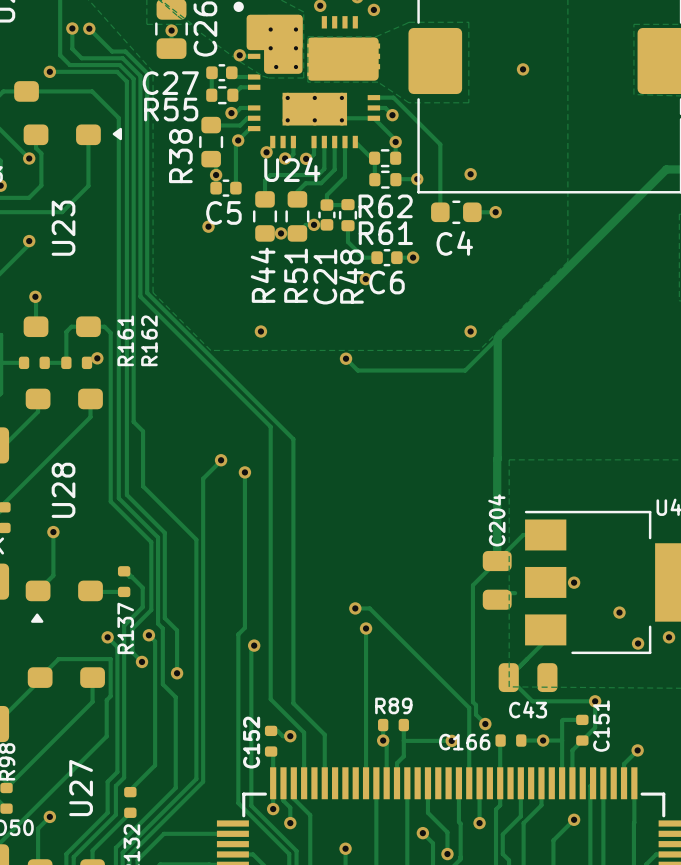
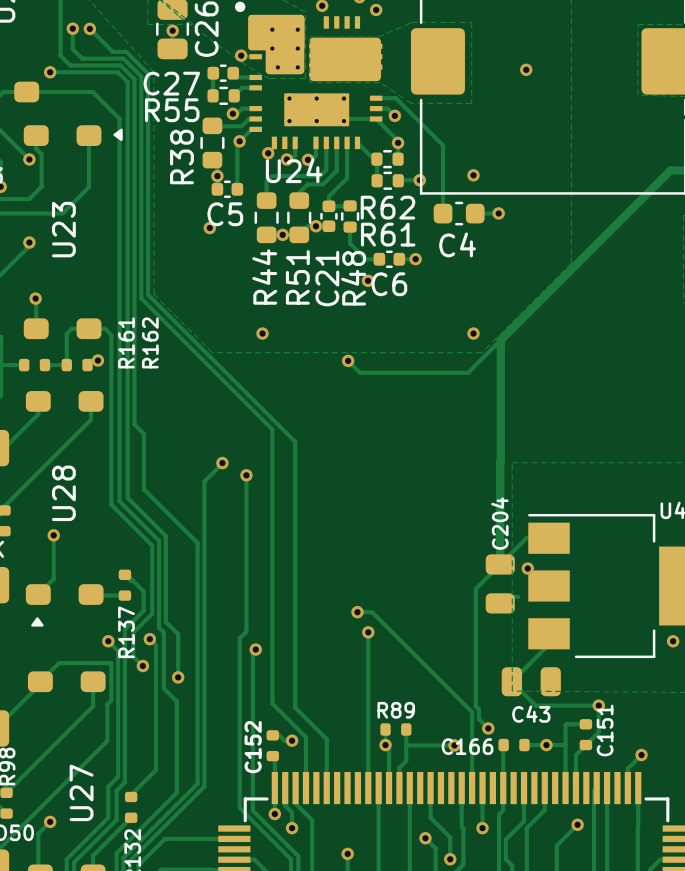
via position: (574, 582) -> (527, 568)
via: (619, 612) -> none
via: (638, 643) -> none

